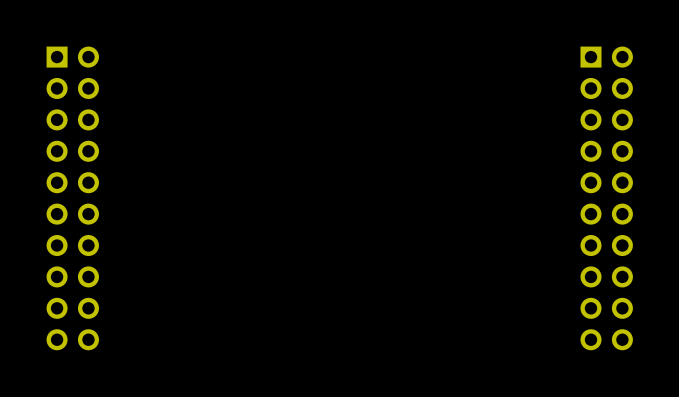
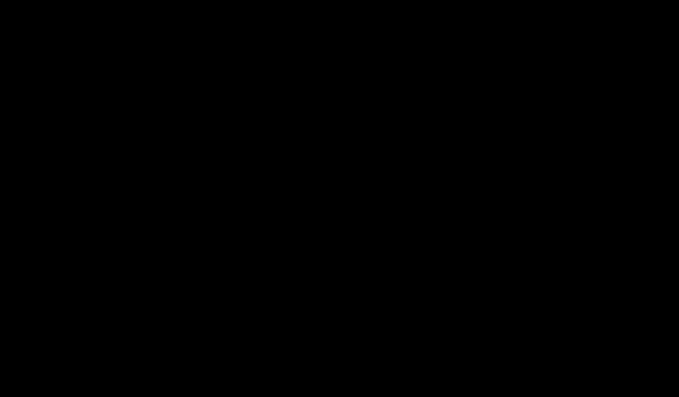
part: (72, 198) -> none
part: (606, 198) -> none

